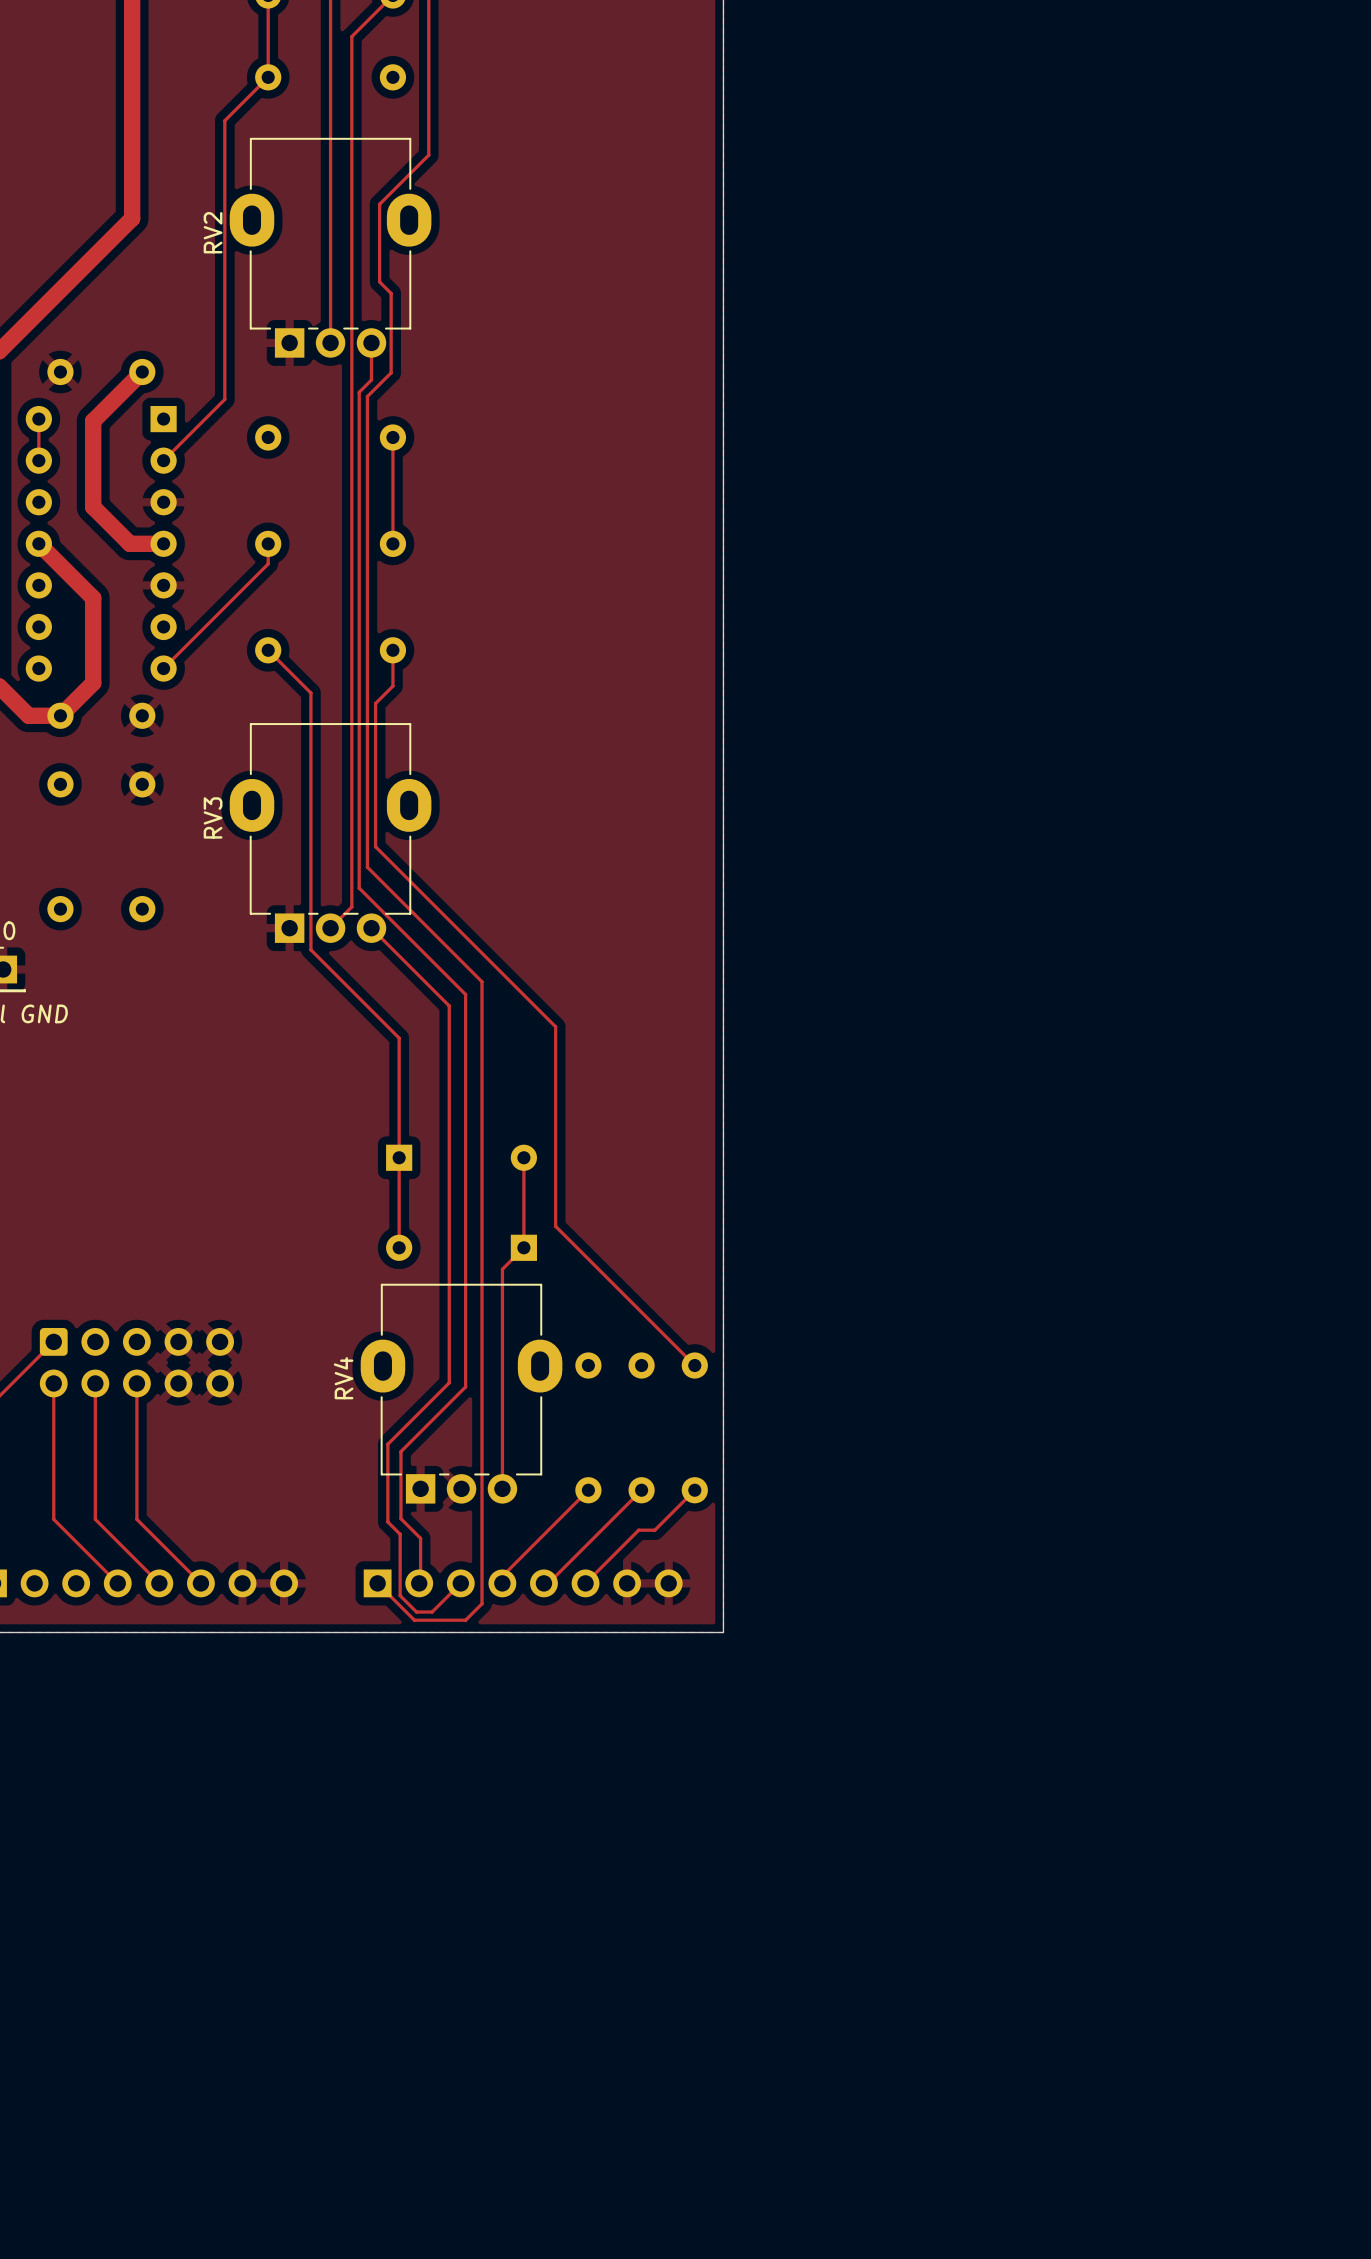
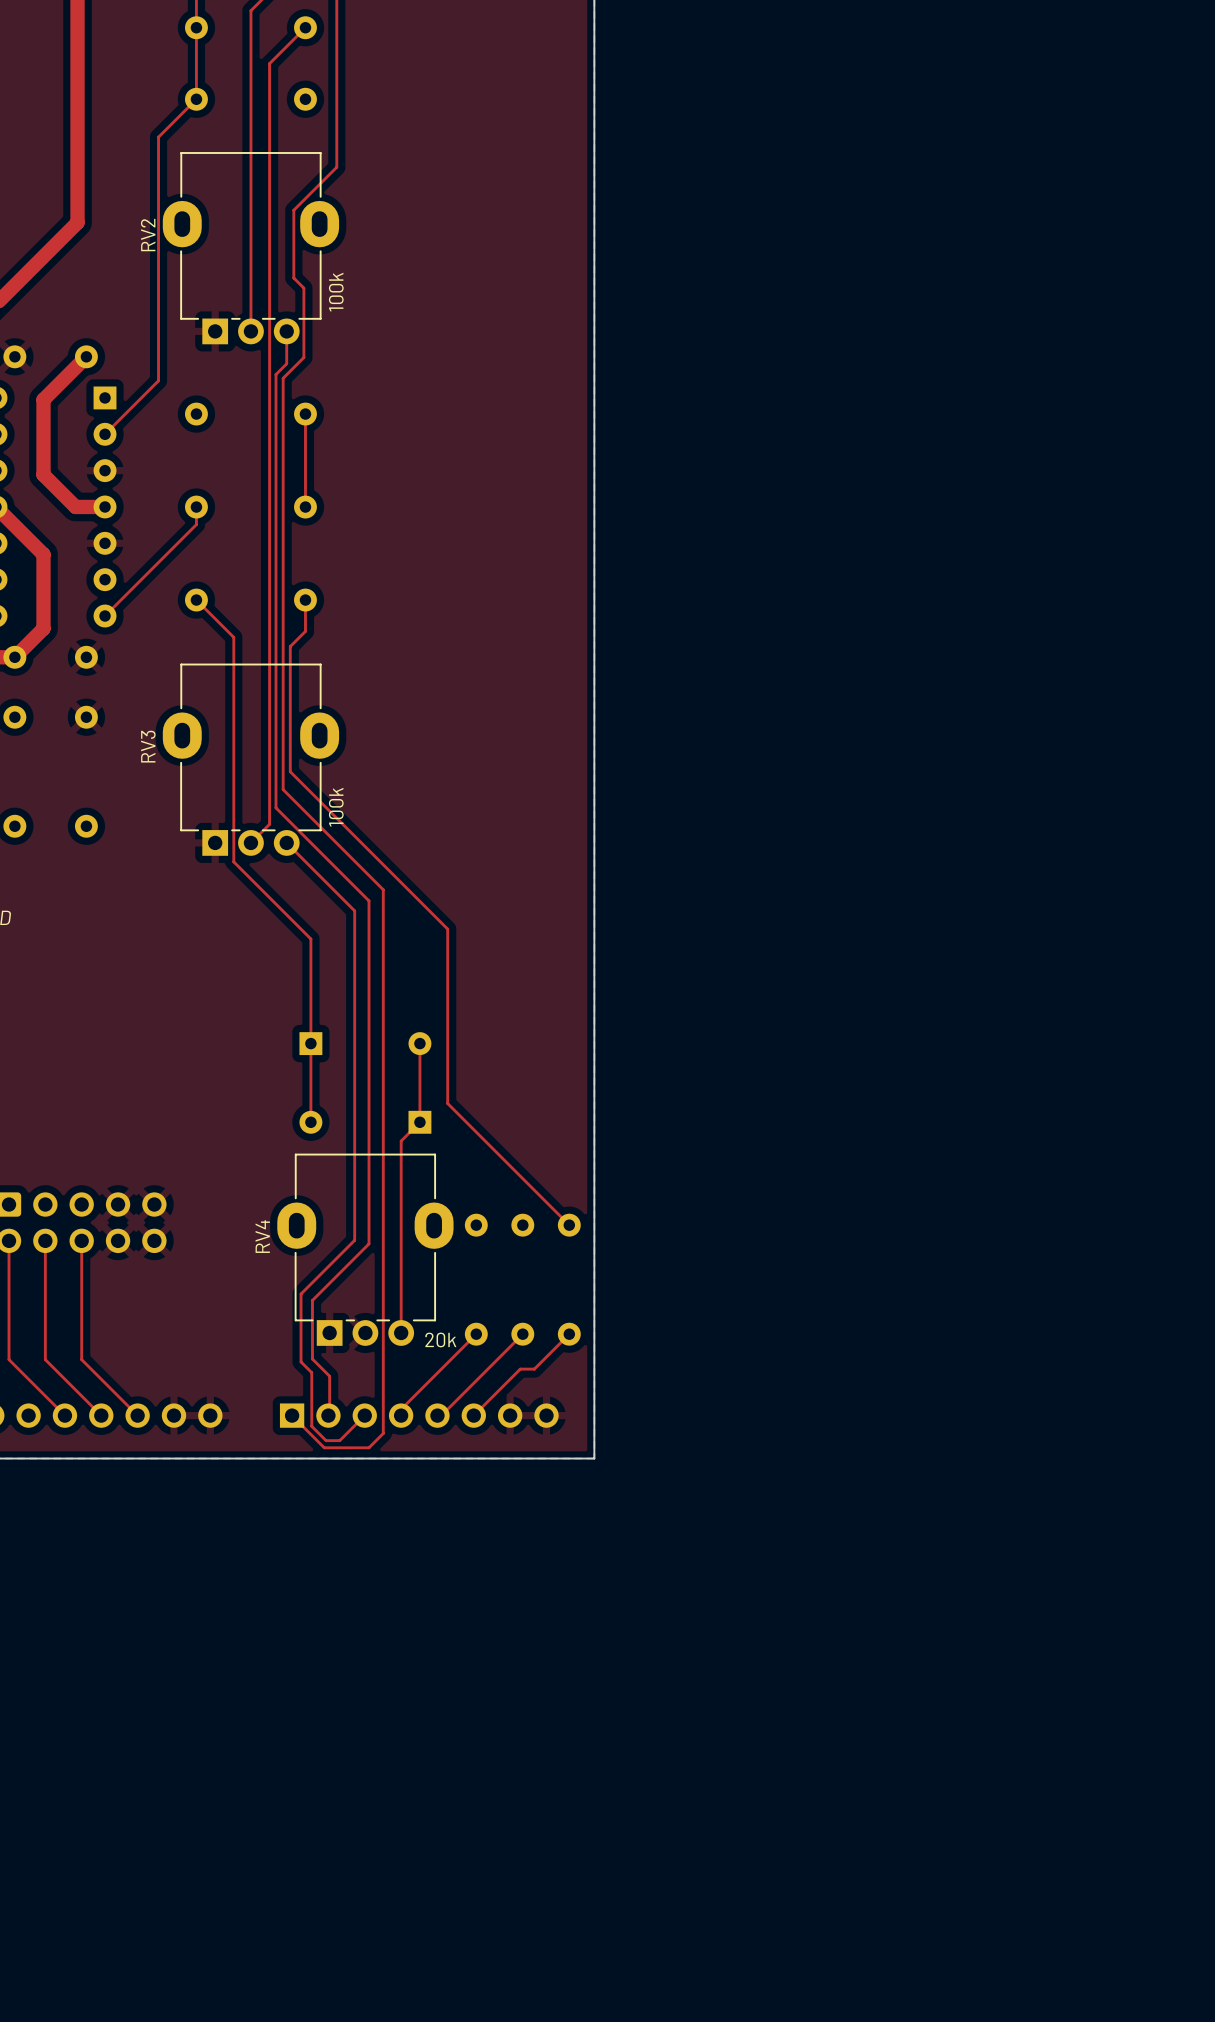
RV2 value: none -> 100k (336, 292)
RV3 value: none -> 100k (336, 807)
RV4 value: none -> 20k (440, 1339)

